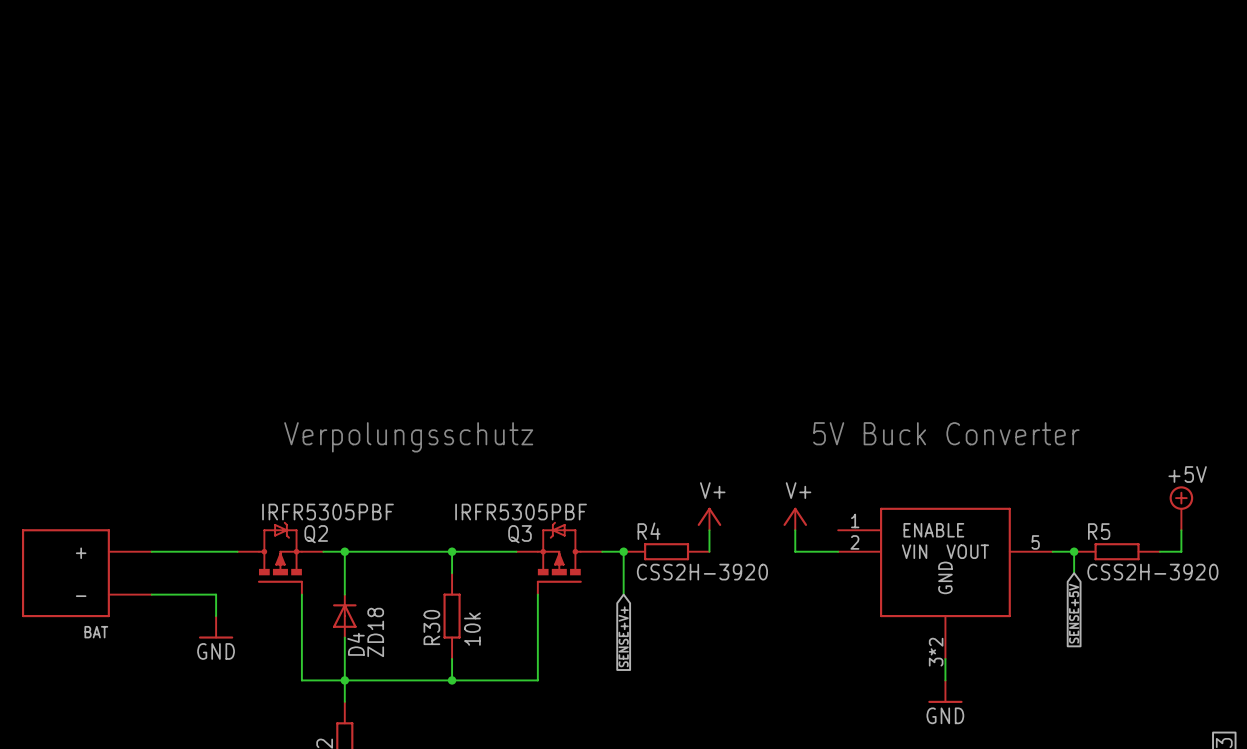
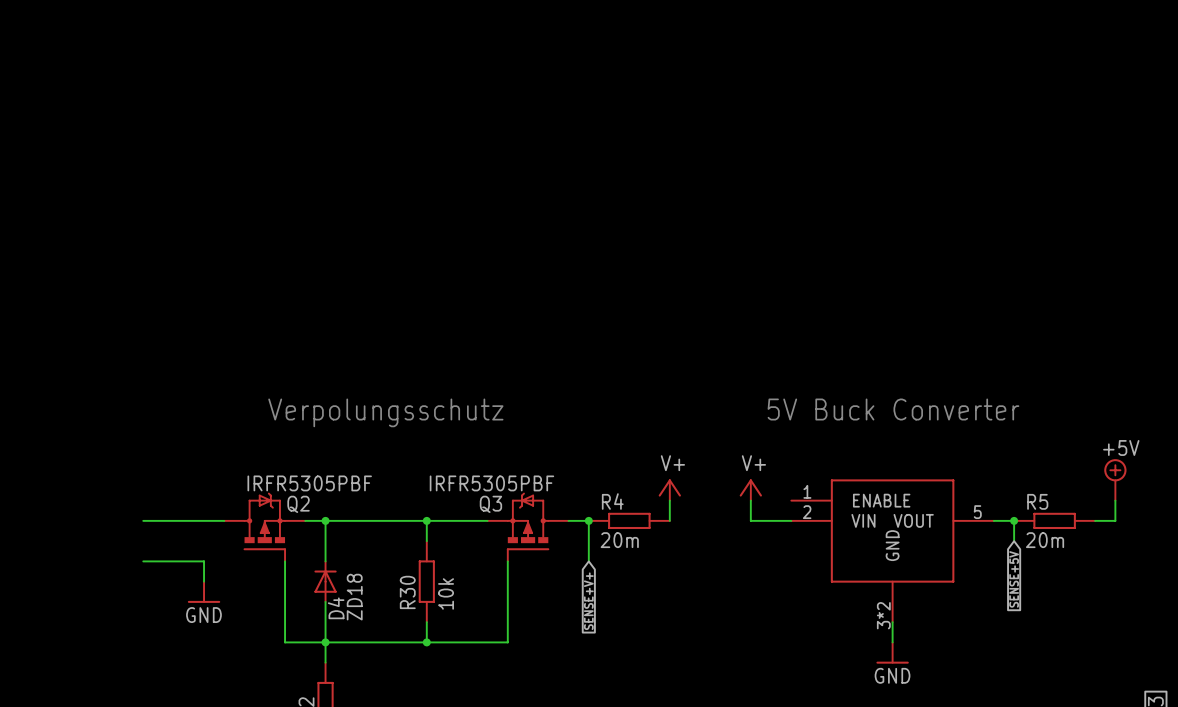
R4 value: CSS2H-3920 (702, 572) -> 20m (619, 540)
R5 value: CSS2H-3920 (1152, 572) -> 20m (1045, 540)
BAT: (86, 573) -> none

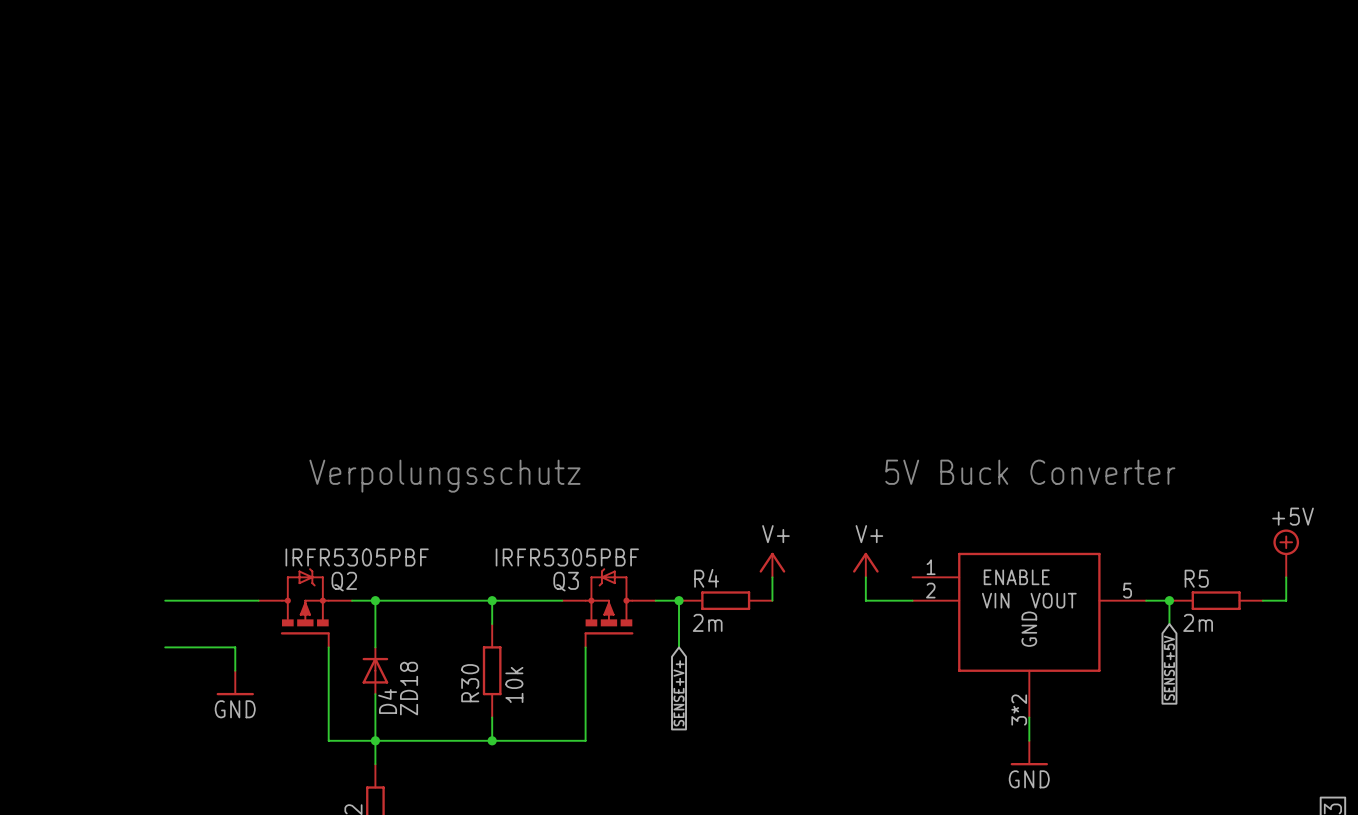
R4 value: 20m (619, 540) -> 2m (707, 622)
R5 value: 20m (1045, 540) -> 2m (1198, 622)

